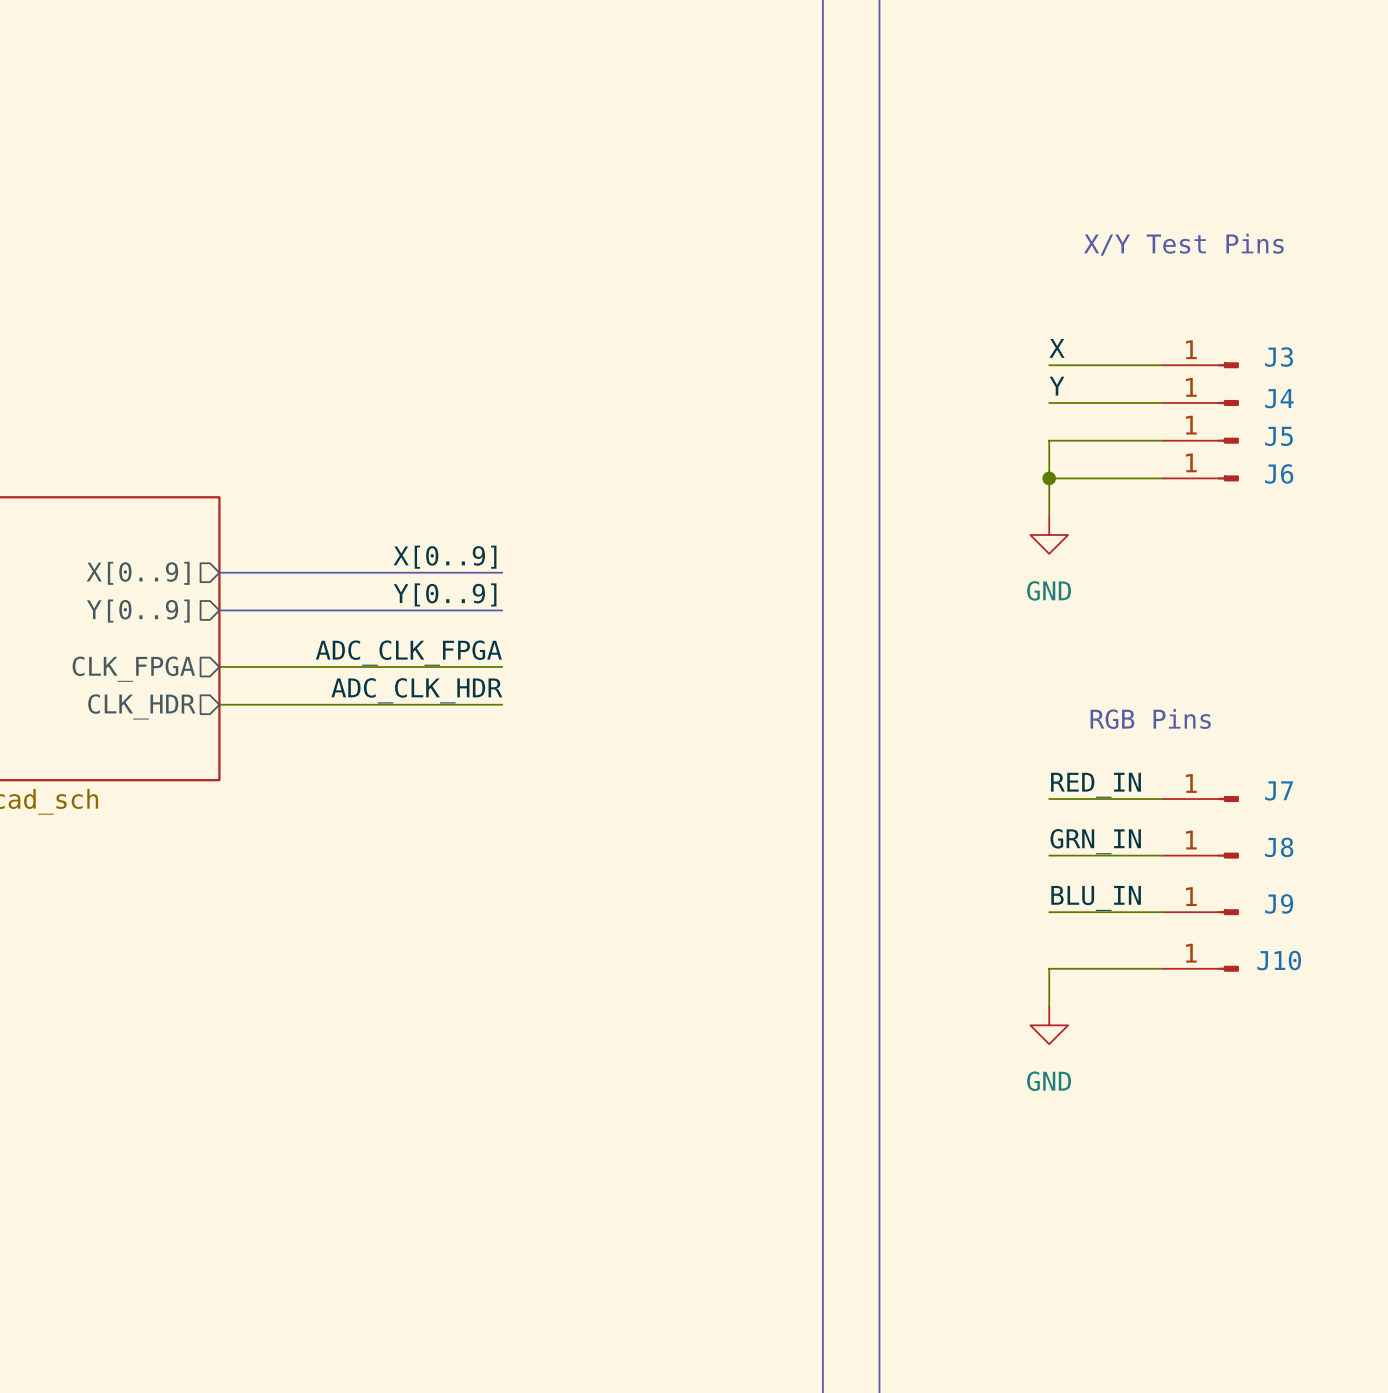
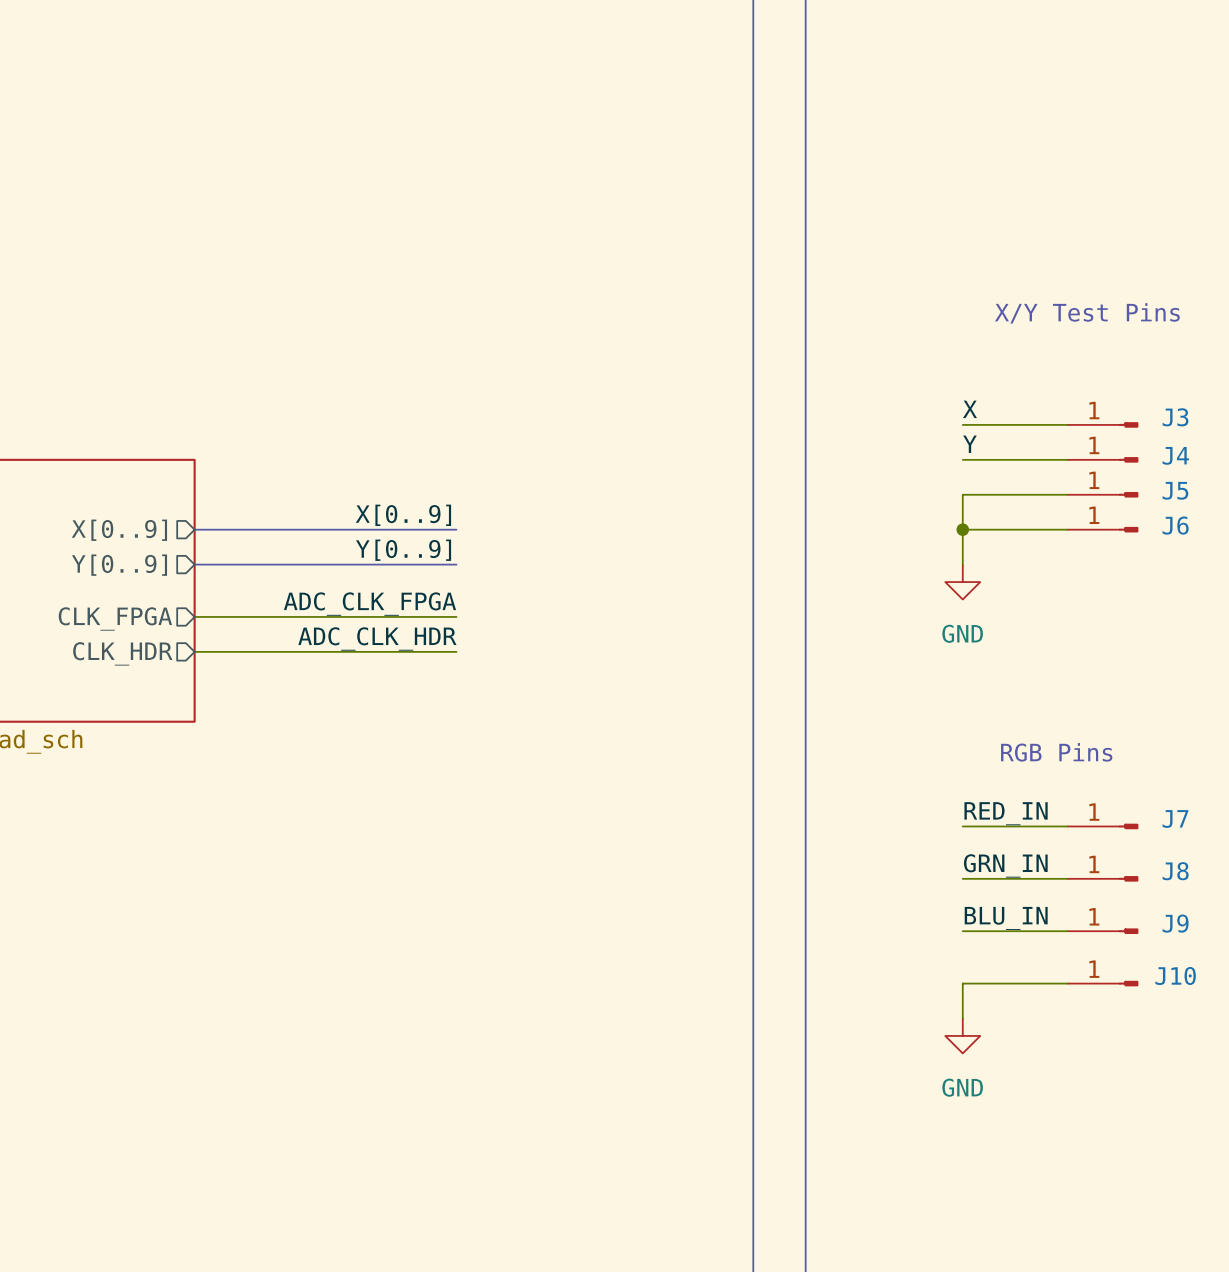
text position: X/Y Test Pins (1183, 244) -> X/Y Test Pins (1087, 313)
label position: X (1057, 348) -> X (969, 409)
wire: (1049, 365) (1162, 365) -> (962, 424) (1067, 424)
J3 position: (1200, 365) -> (1102, 424)
label position: Y (1057, 386) -> Y (969, 444)
wire: (1049, 402) (1162, 402) -> (962, 459) (1067, 459)
J4 position: (1200, 402) -> (1102, 459)
wire: (1162, 440) (1049, 440) (1049, 516) -> (1067, 494) (962, 494) (962, 564)
J5 position: (1200, 440) -> (1102, 494)
wire: (1049, 478) (1162, 478) -> (962, 529) (1067, 529)
junction: (1049, 478) -> none
J6 position: (1200, 478) -> (1102, 529)
power symbol position: GND (1049, 535) -> GND (962, 582)
junction: none -> (962, 529)
text position: RGB Pins (1150, 718) -> RGB Pins (1056, 752)
label position: RED_IN (1095, 785) -> RED_IN (1006, 813)
wire: (1049, 799) (1162, 799) -> (962, 826) (1067, 826)
J7 position: (1200, 799) -> (1102, 826)
label position: GRN_IN (1095, 841) -> GRN_IN (1005, 865)
wire: (1049, 855) (1162, 855) -> (962, 878) (1067, 878)
J8 position: (1200, 855) -> (1102, 878)
label position: BLU_IN (1096, 898) -> BLU_IN (1006, 918)
wire: (1049, 912) (1162, 912) -> none
J9 position: (1200, 912) -> (1102, 931)
wire: (1162, 968) (1049, 968) (1049, 1006) -> (1067, 931) (962, 931)
J10 position: (1200, 968) -> (1102, 983)
power symbol position: GND (1049, 1025) -> GND (962, 1035)
wire: none -> (1067, 983) (962, 983) (962, 1018)

